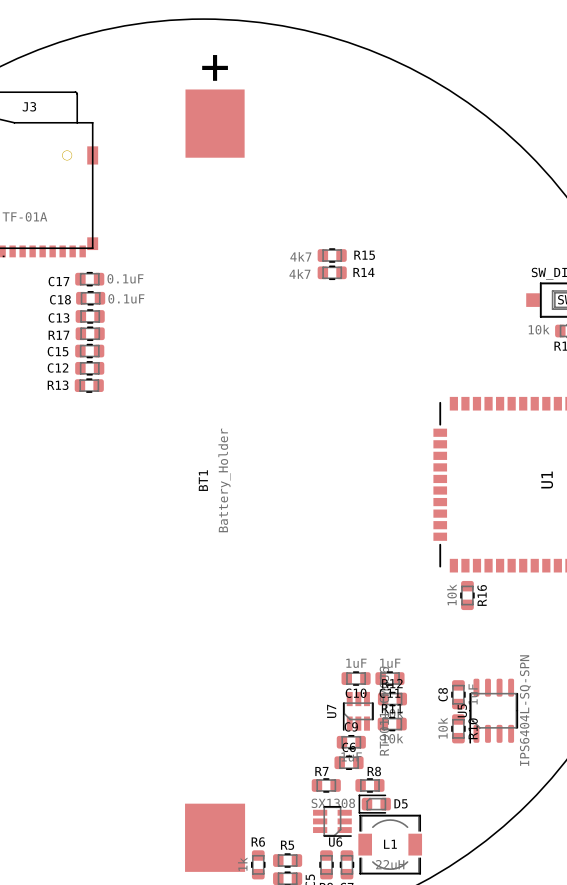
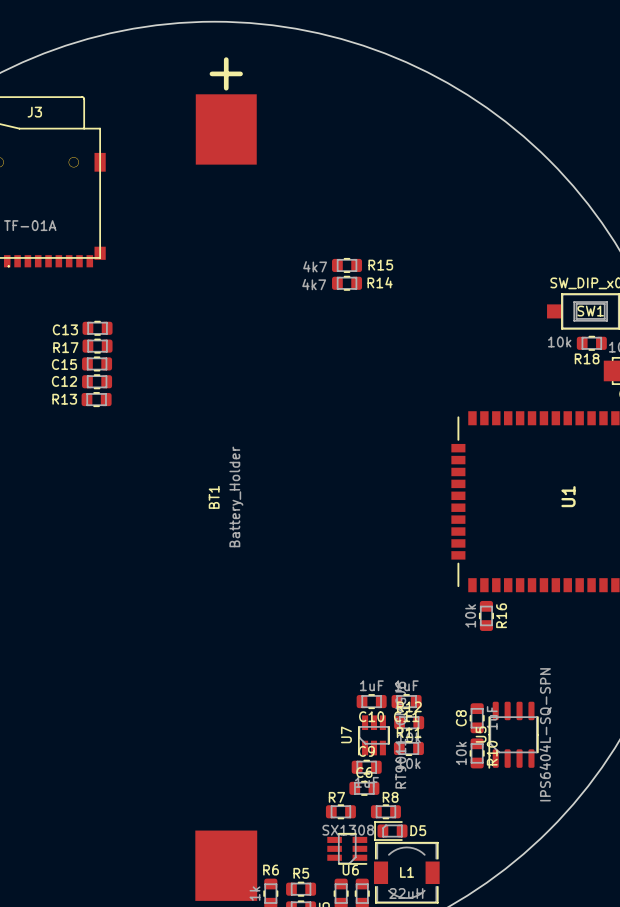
C17: 0.1uF (89, 279) -> none
C18: 0.1uF (90, 298) -> none

